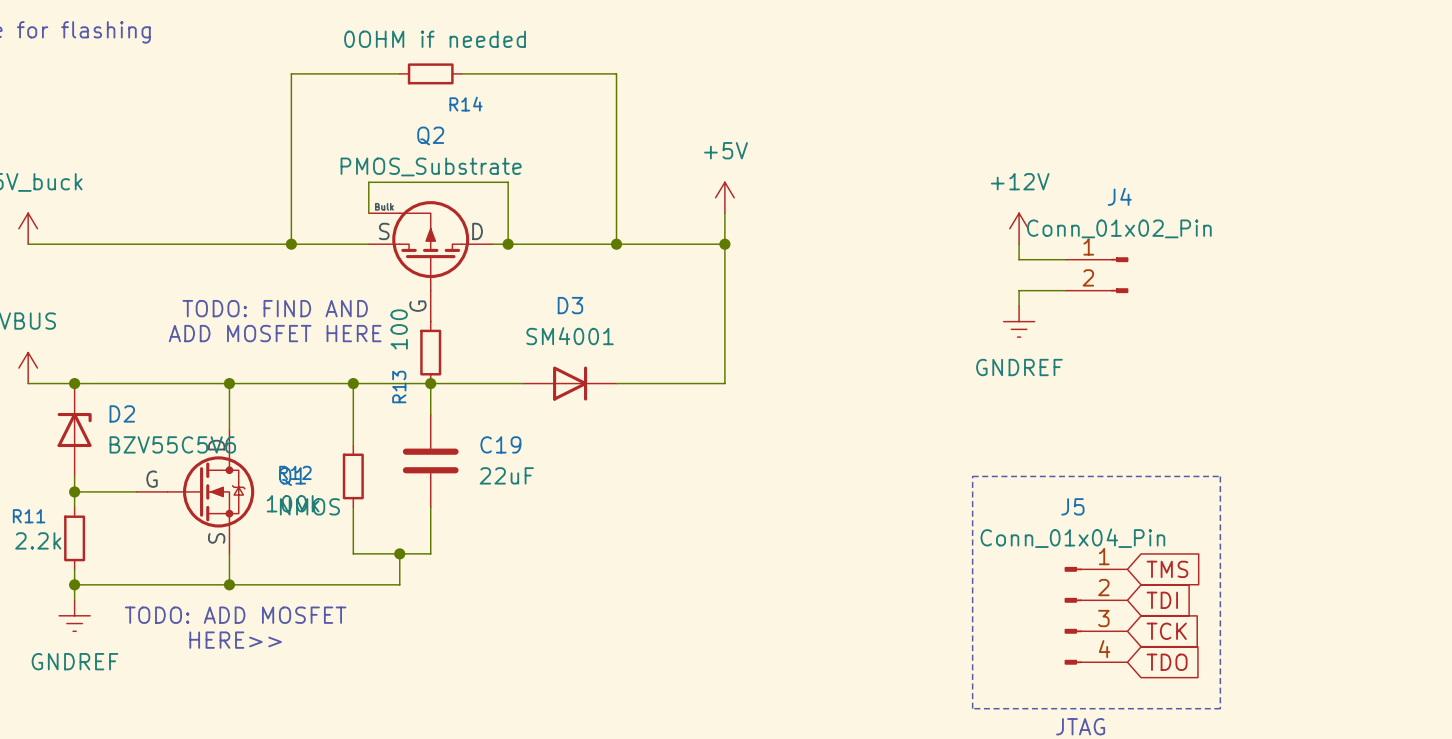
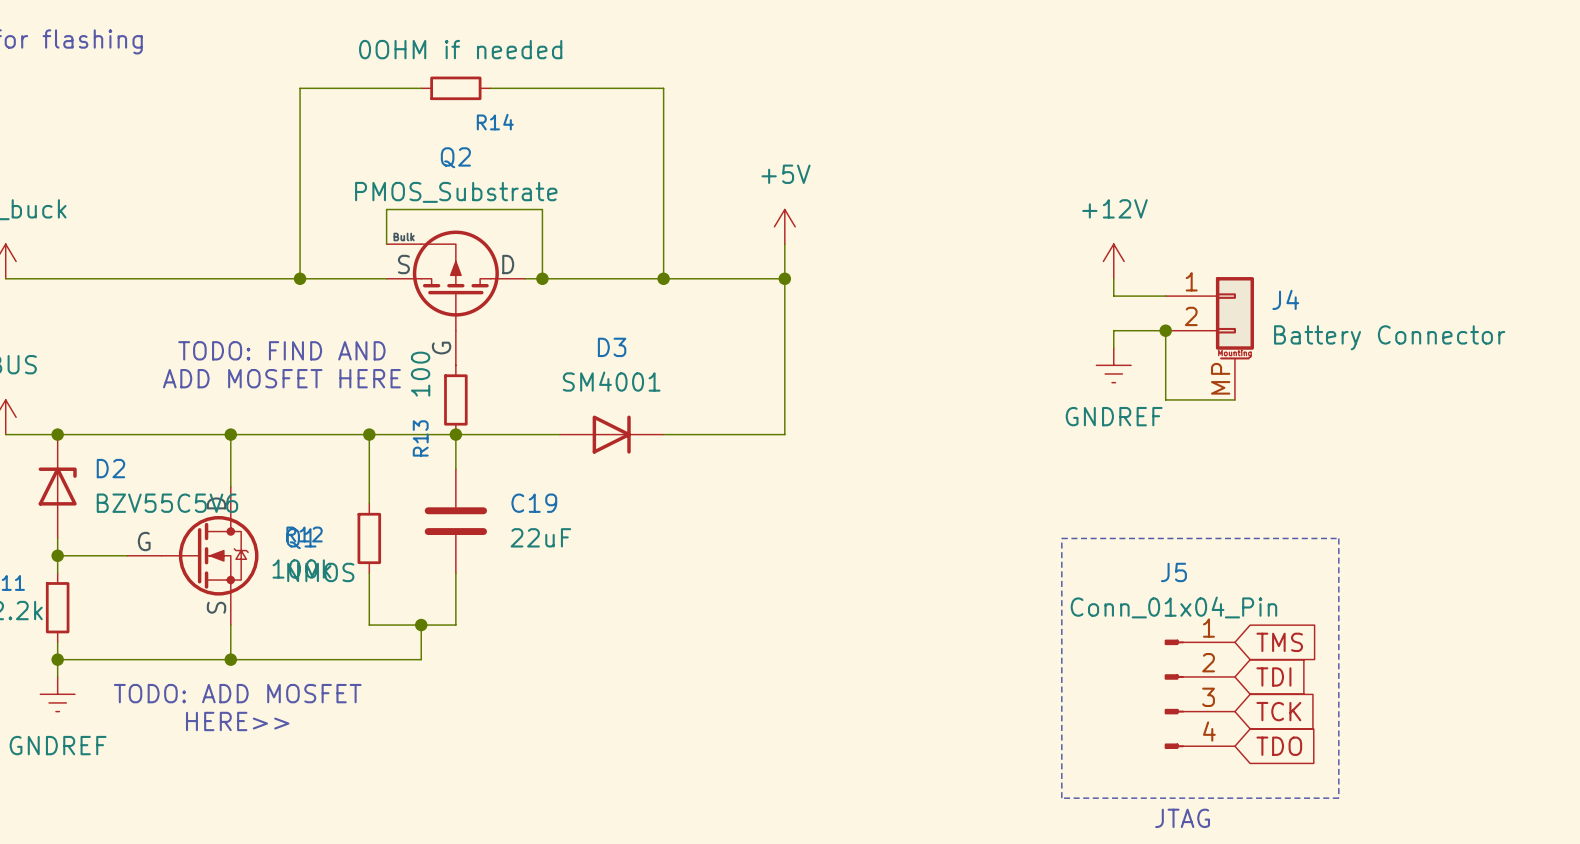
J4 name position: J4 (1119, 196) -> J4 (1285, 299)
J4 value: Conn_01x02_Pin (1119, 228) -> Battery Connector (1389, 337)
J4 symbol: [1065, 257, 1129, 294] -> [1165, 277, 1254, 400]
wire: none -> (1165, 330) (1165, 399) (1234, 399)
junction: none -> (1165, 330)

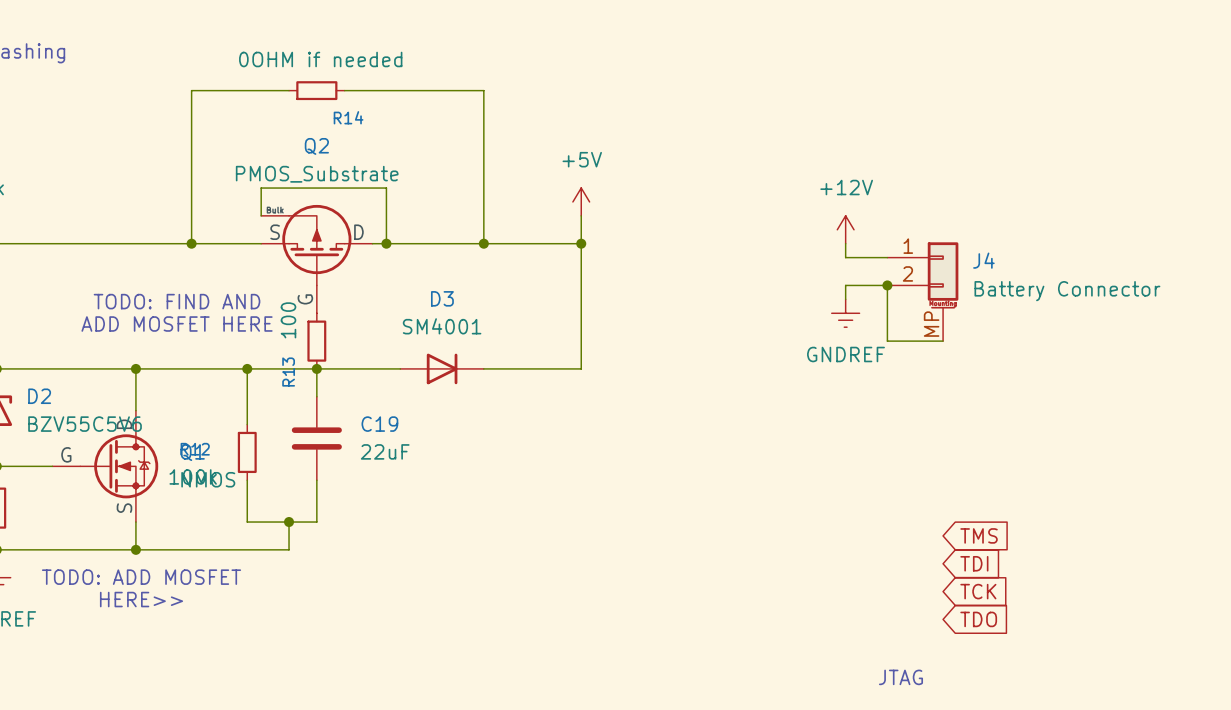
line: (1061, 538) (1338, 538) (1338, 798) (1061, 798) (1061, 538) -> none
J5: Conn_01x04_Pin (1199, 694) -> none

